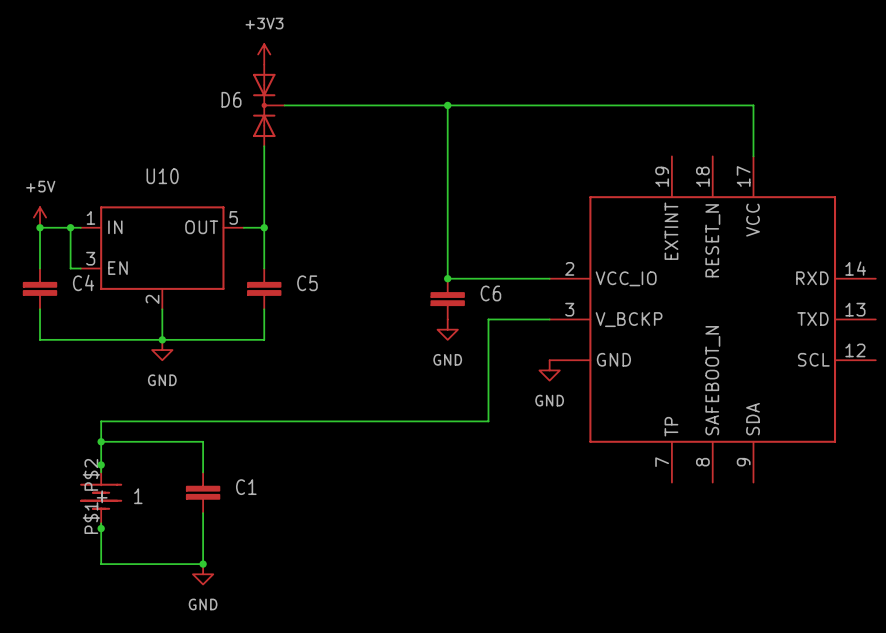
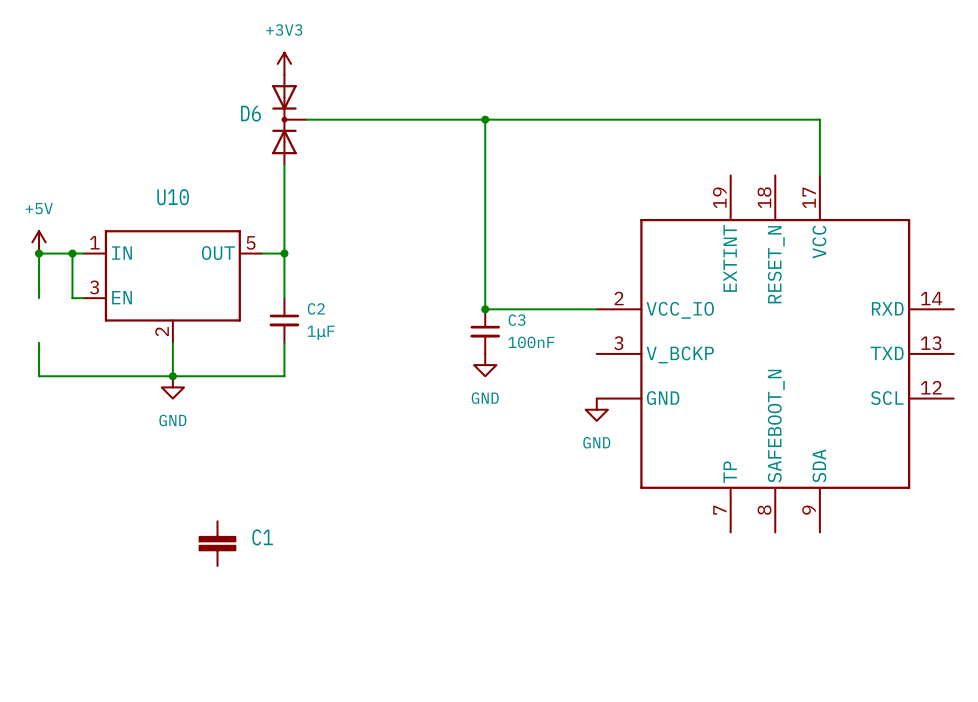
C4: (40, 288) -> none
C5: (264, 288) -> none
C2: none -> 1μF (284, 320)
C6: (447, 299) -> none
C3: none -> 100nF (485, 331)
wire: (549, 319) (488, 319) (488, 421) (101, 421) (101, 472) -> none
wire: (101, 441) (203, 441) (203, 472) -> none
junction: (101, 441) -> none
junction: (101, 464) -> none
1: (101, 496) -> none
wire: (203, 513) (203, 564) (101, 564) (101, 523) -> none
junction: (101, 528) -> none
junction: (203, 564) -> none
power symbol: GND (203, 574) -> none

